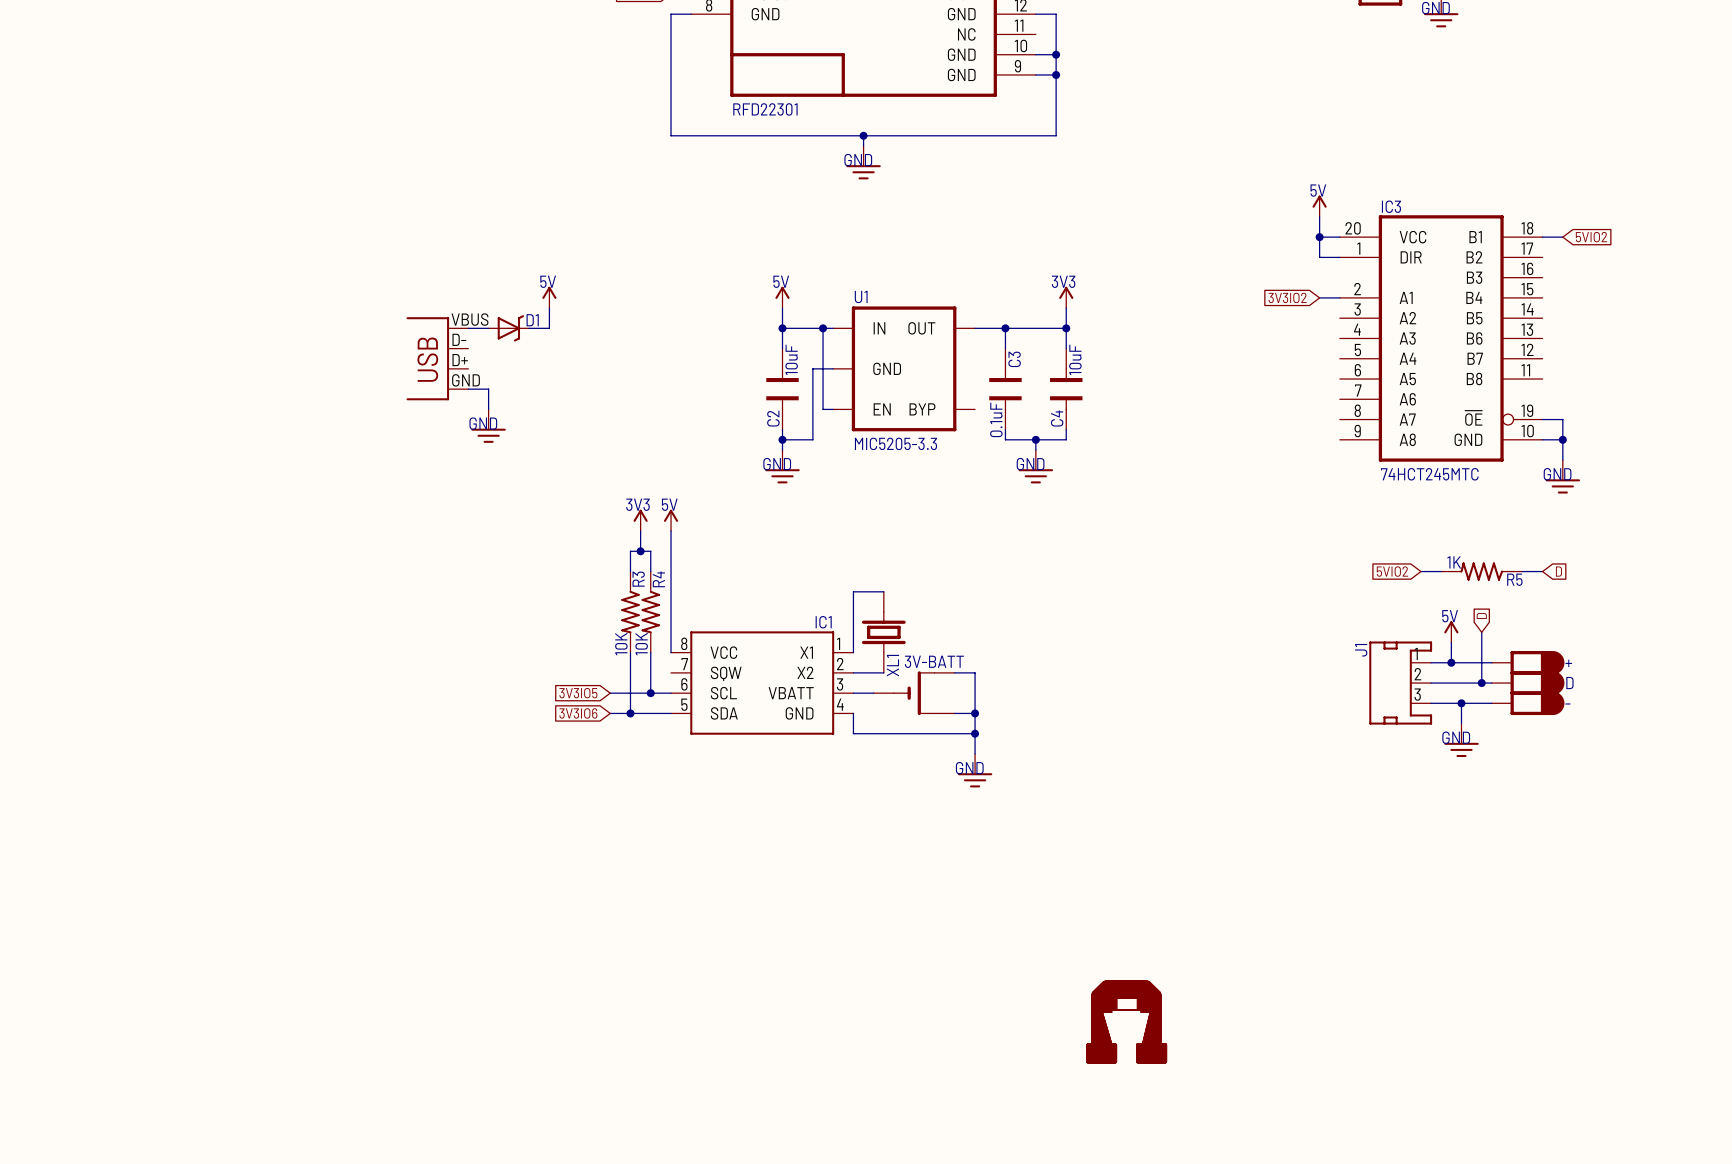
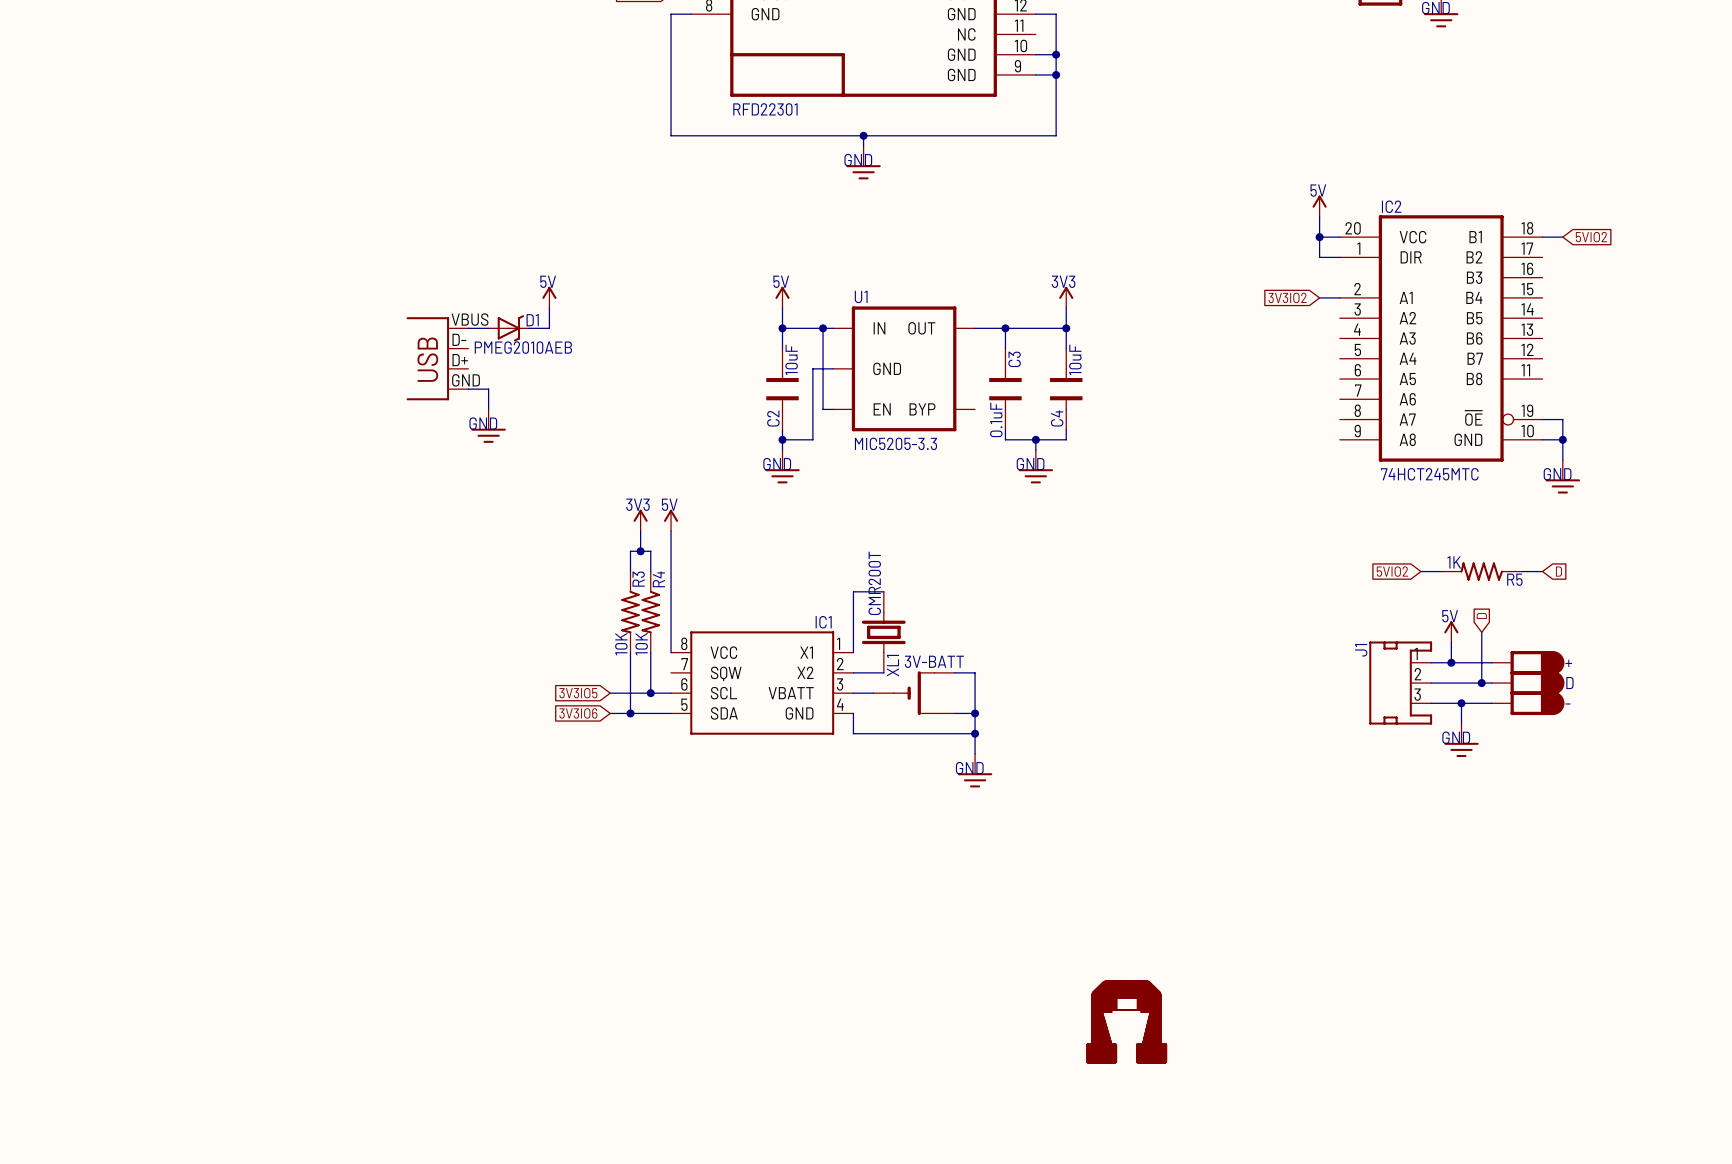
IC3 name: IC3 (1391, 206) -> IC2 (1391, 206)
D1 value: none -> PMEG2010AEB (523, 347)
XL1 value: none -> CMR200T (874, 583)

